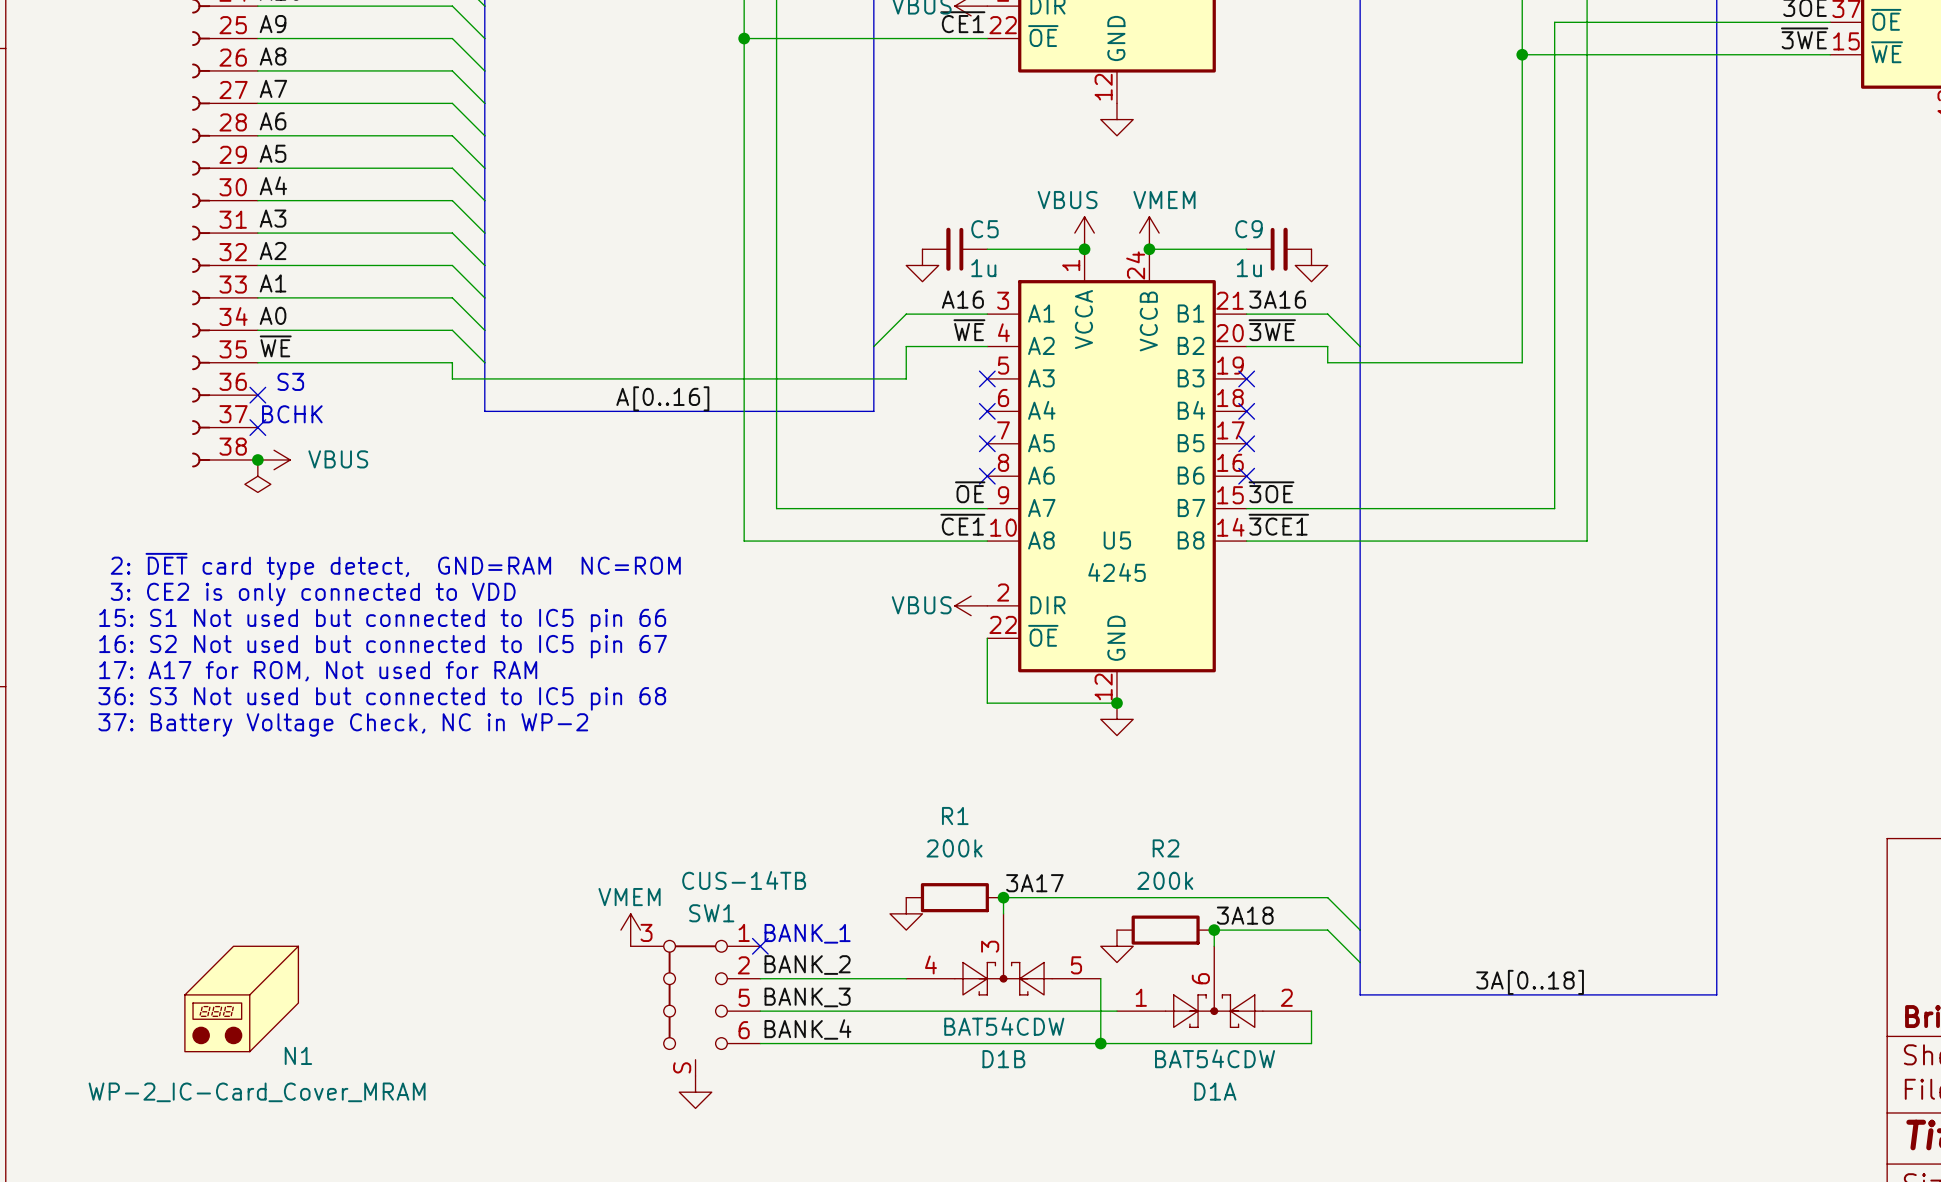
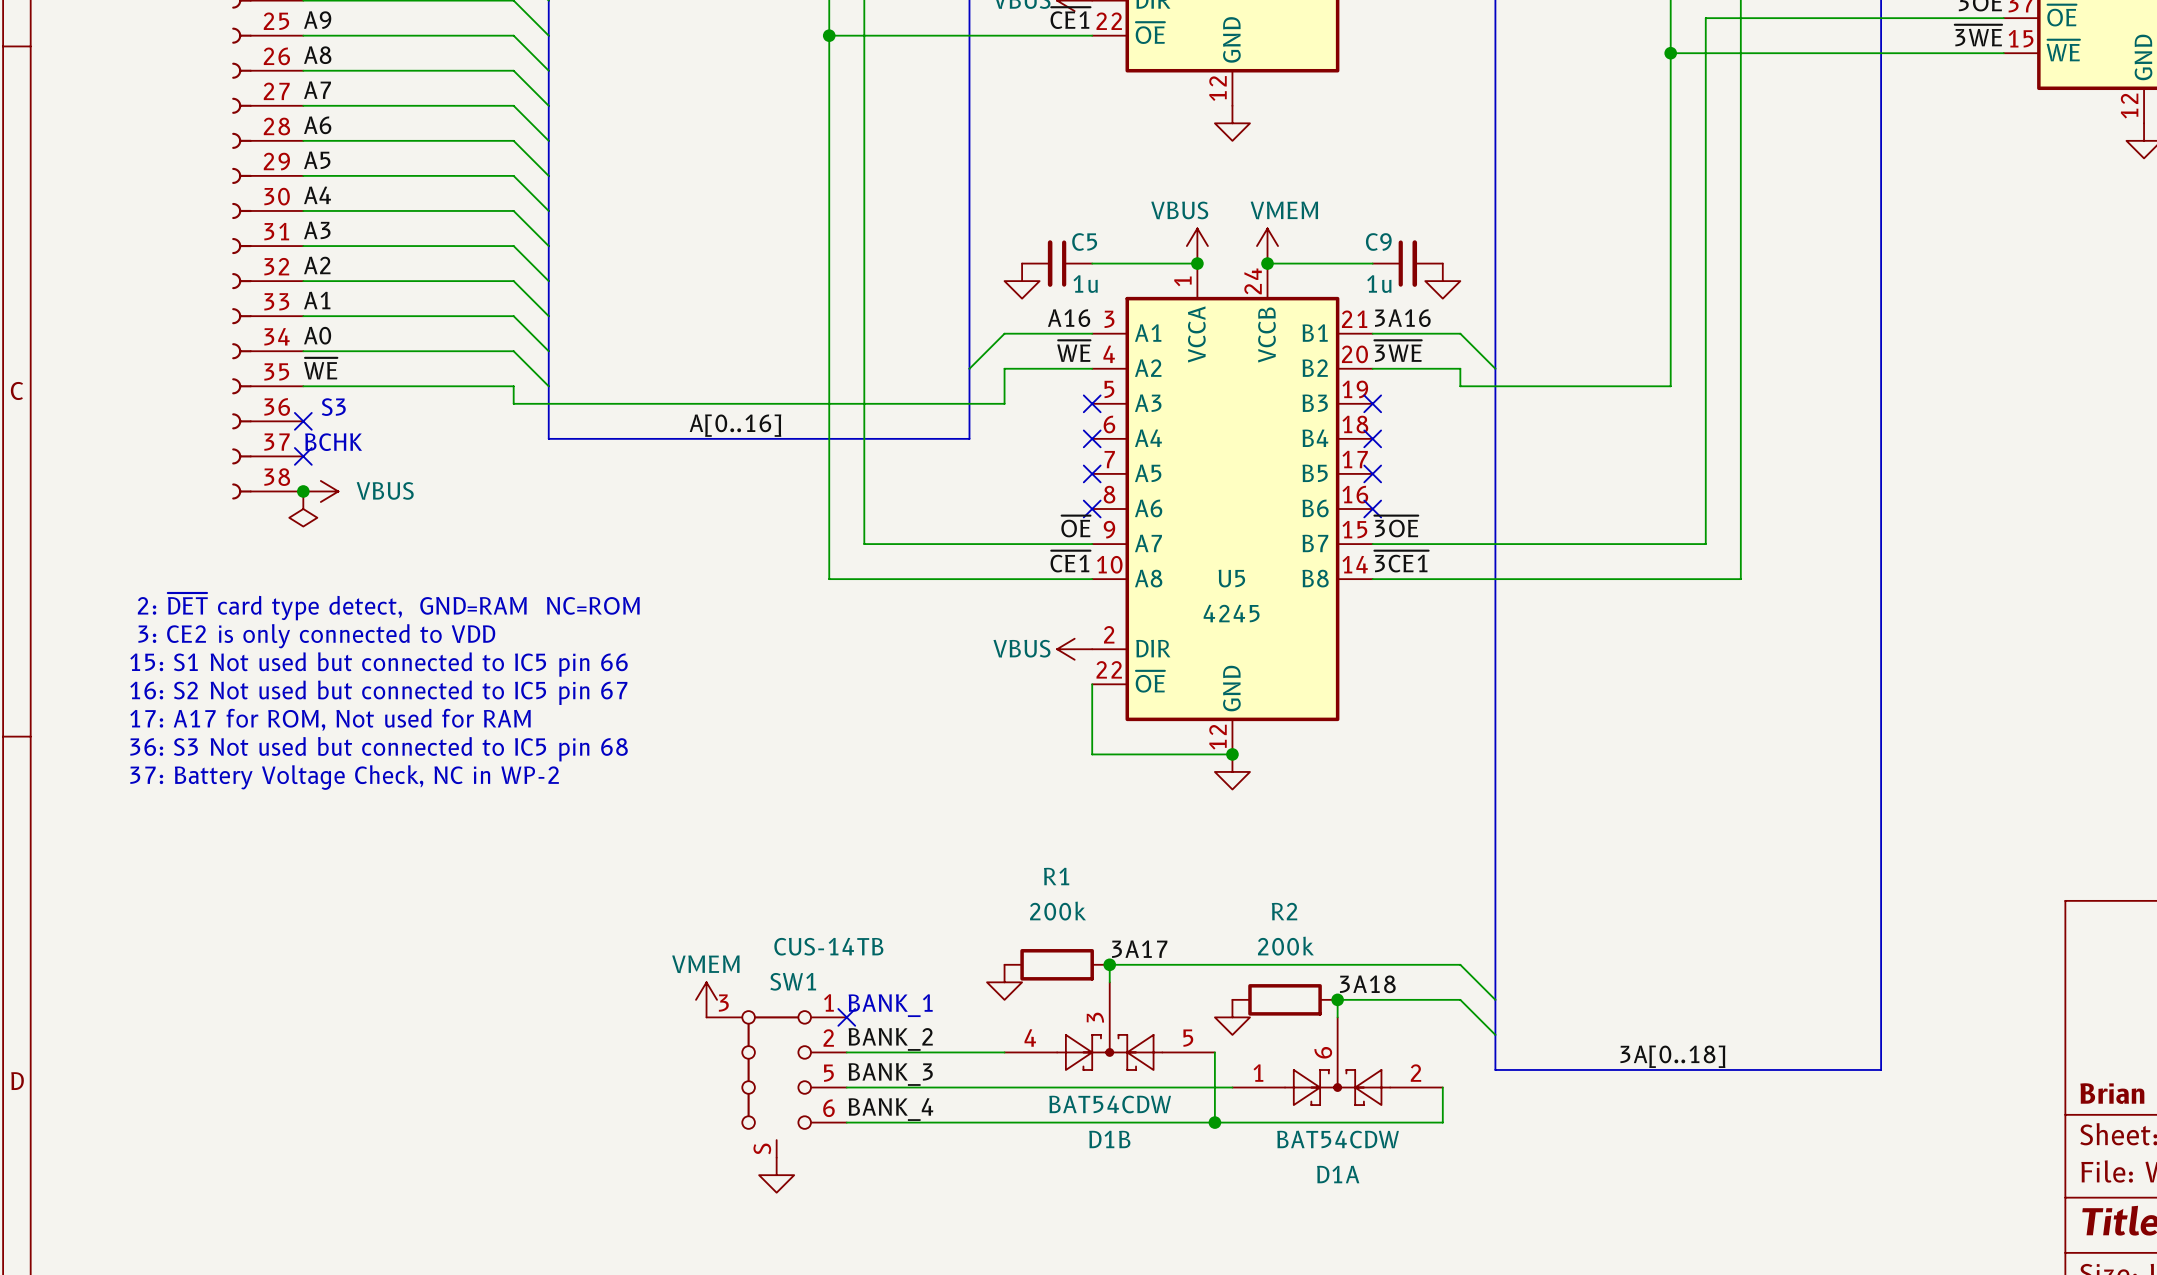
N1: WP-2_IC-Card_Cover_MRAM (241, 998) -> none

